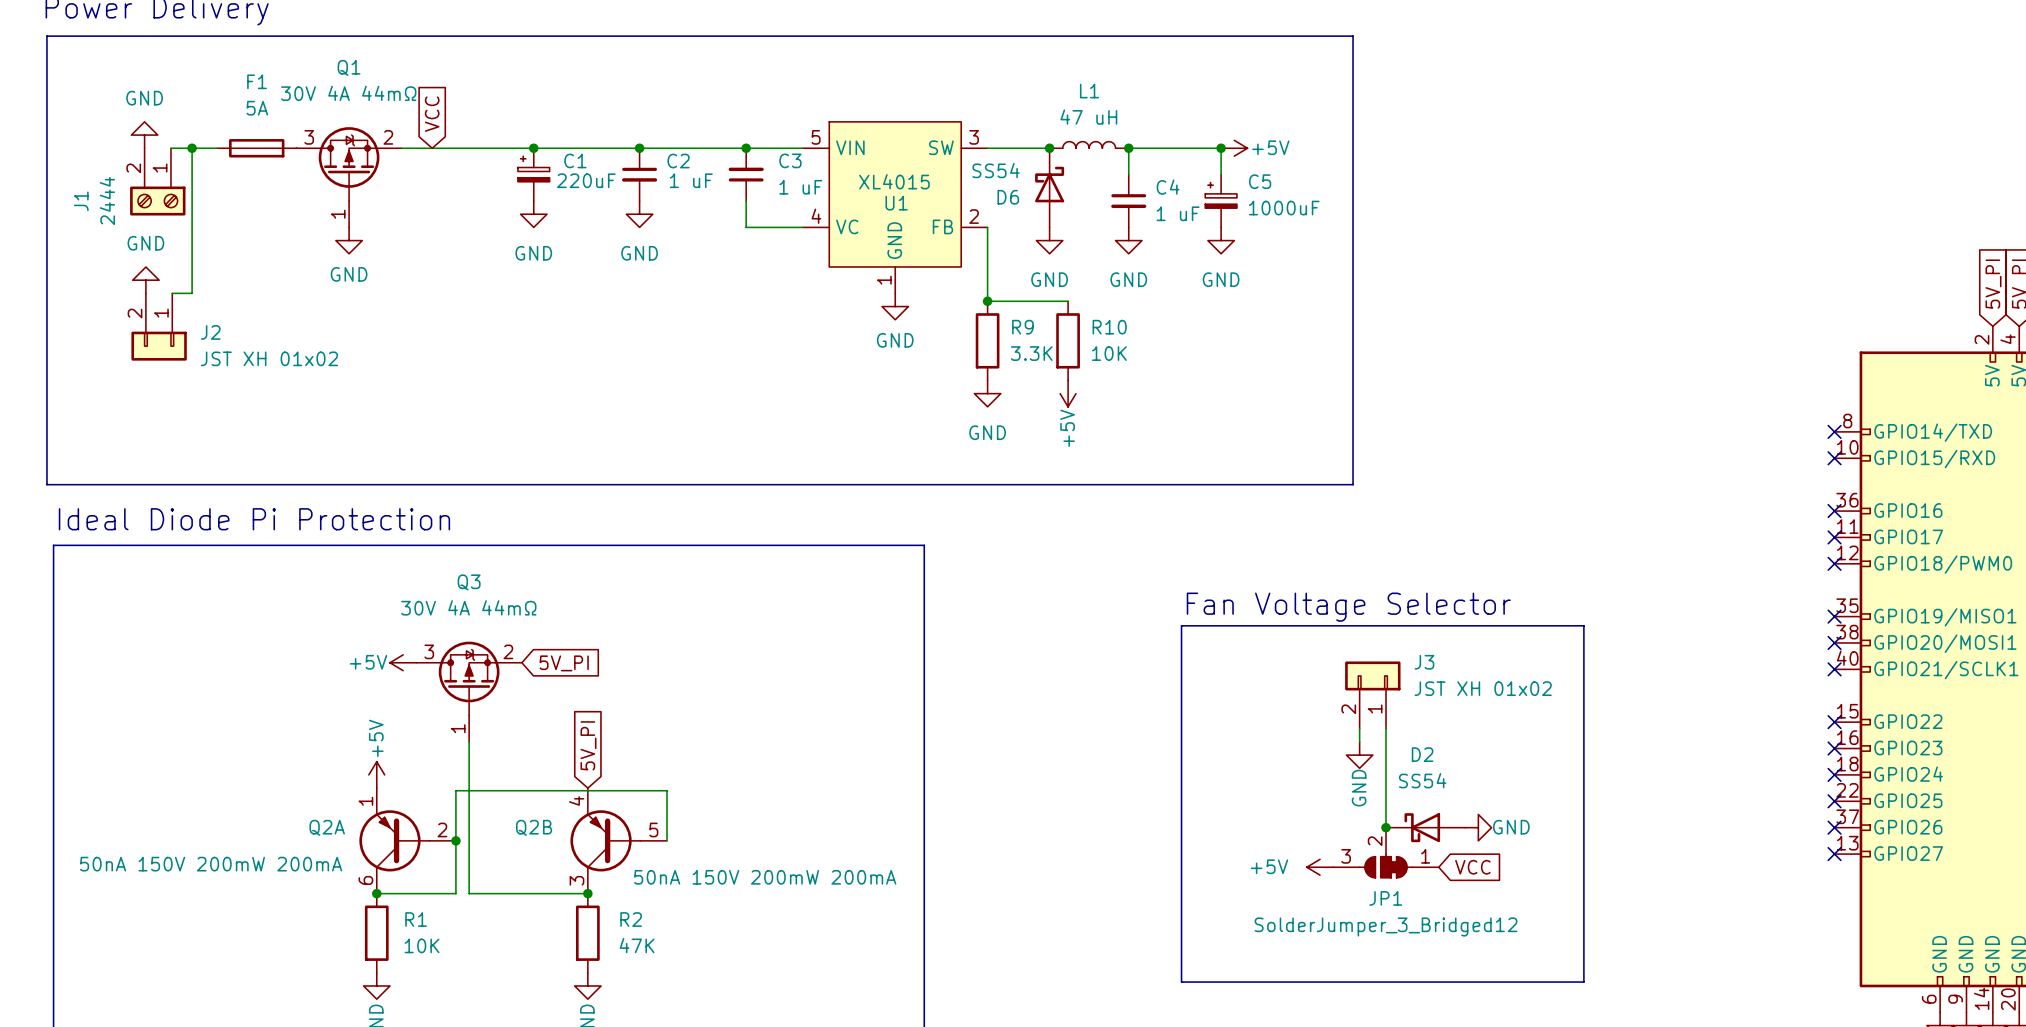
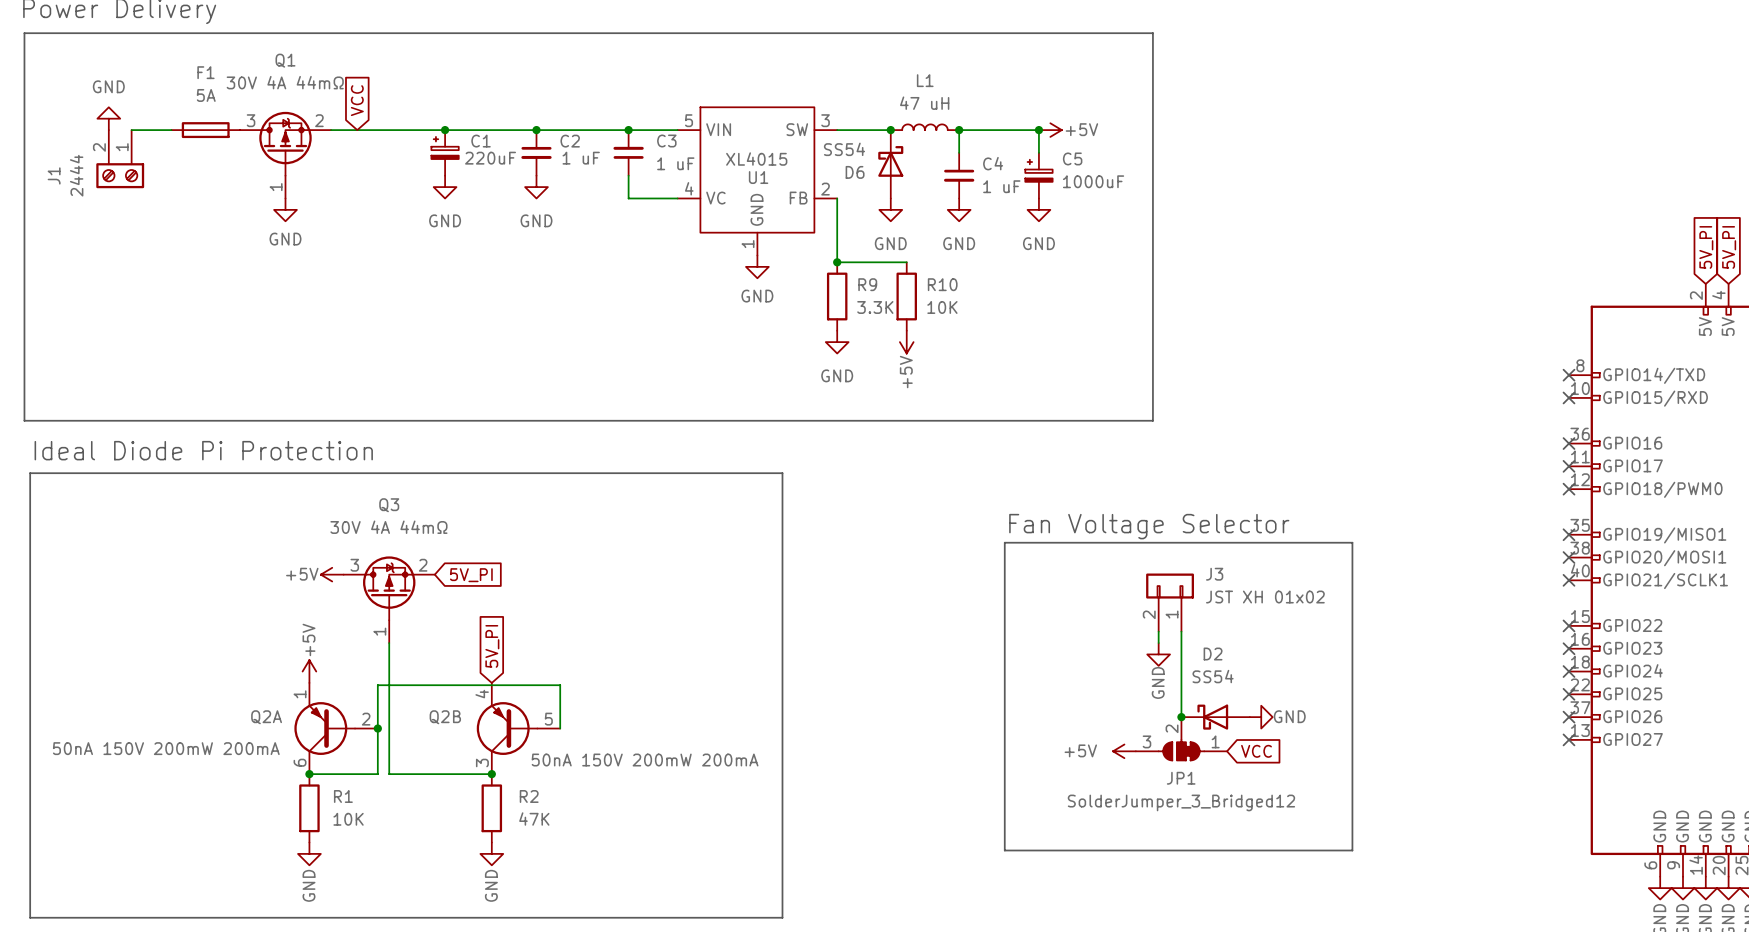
wire: (192, 148) (192, 293) (172, 293) -> none
junction: (192, 148) -> none
power symbol: GND (145, 280) -> none
J2: JST XH 01x02 (159, 327) -> none

